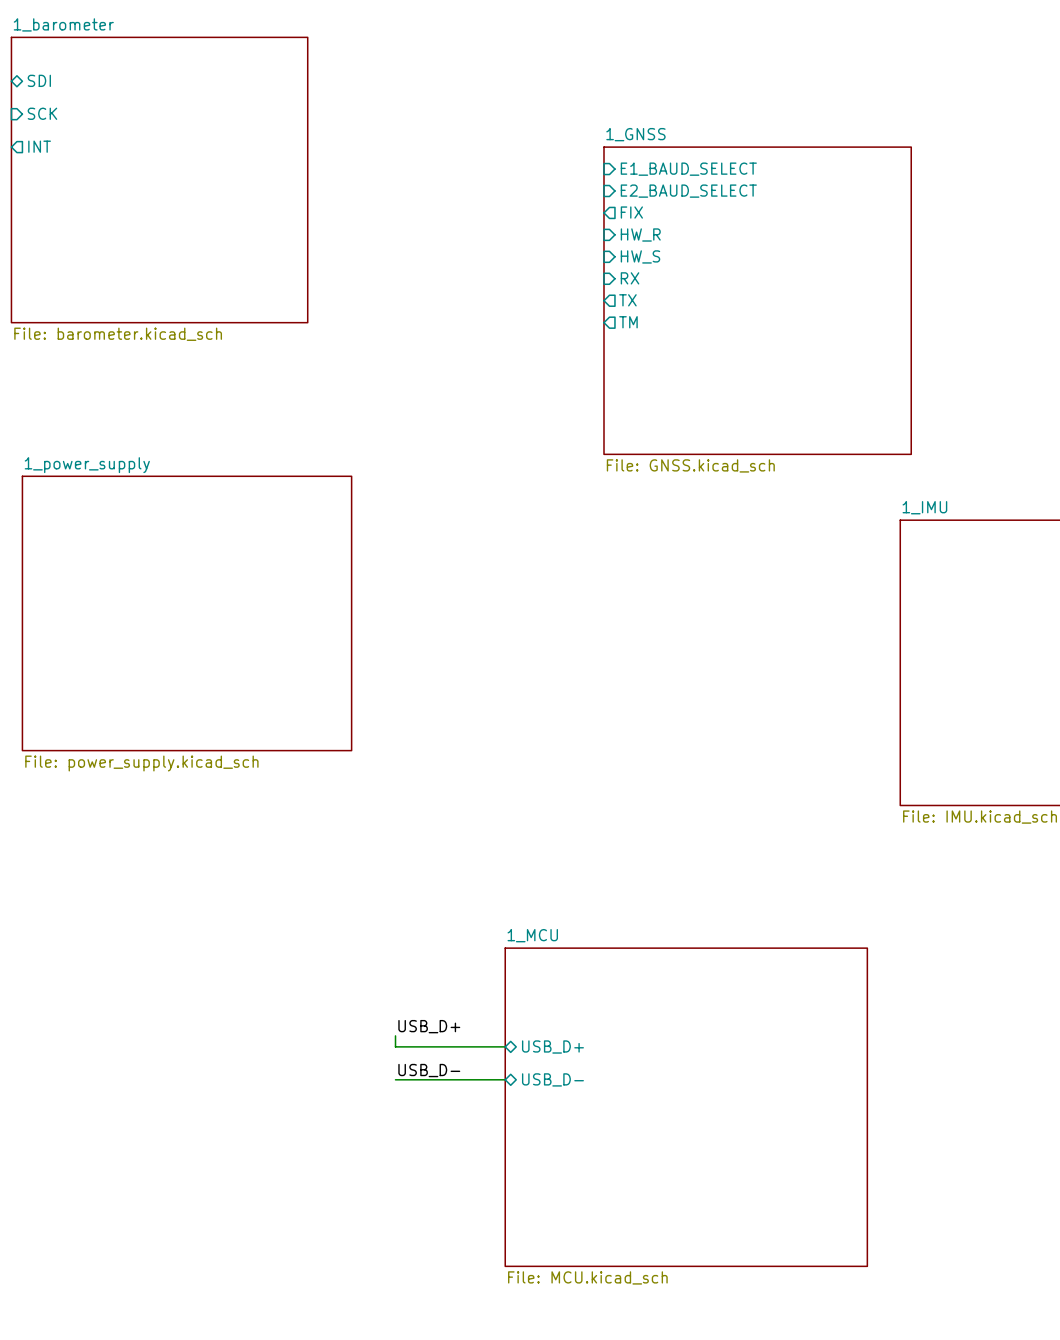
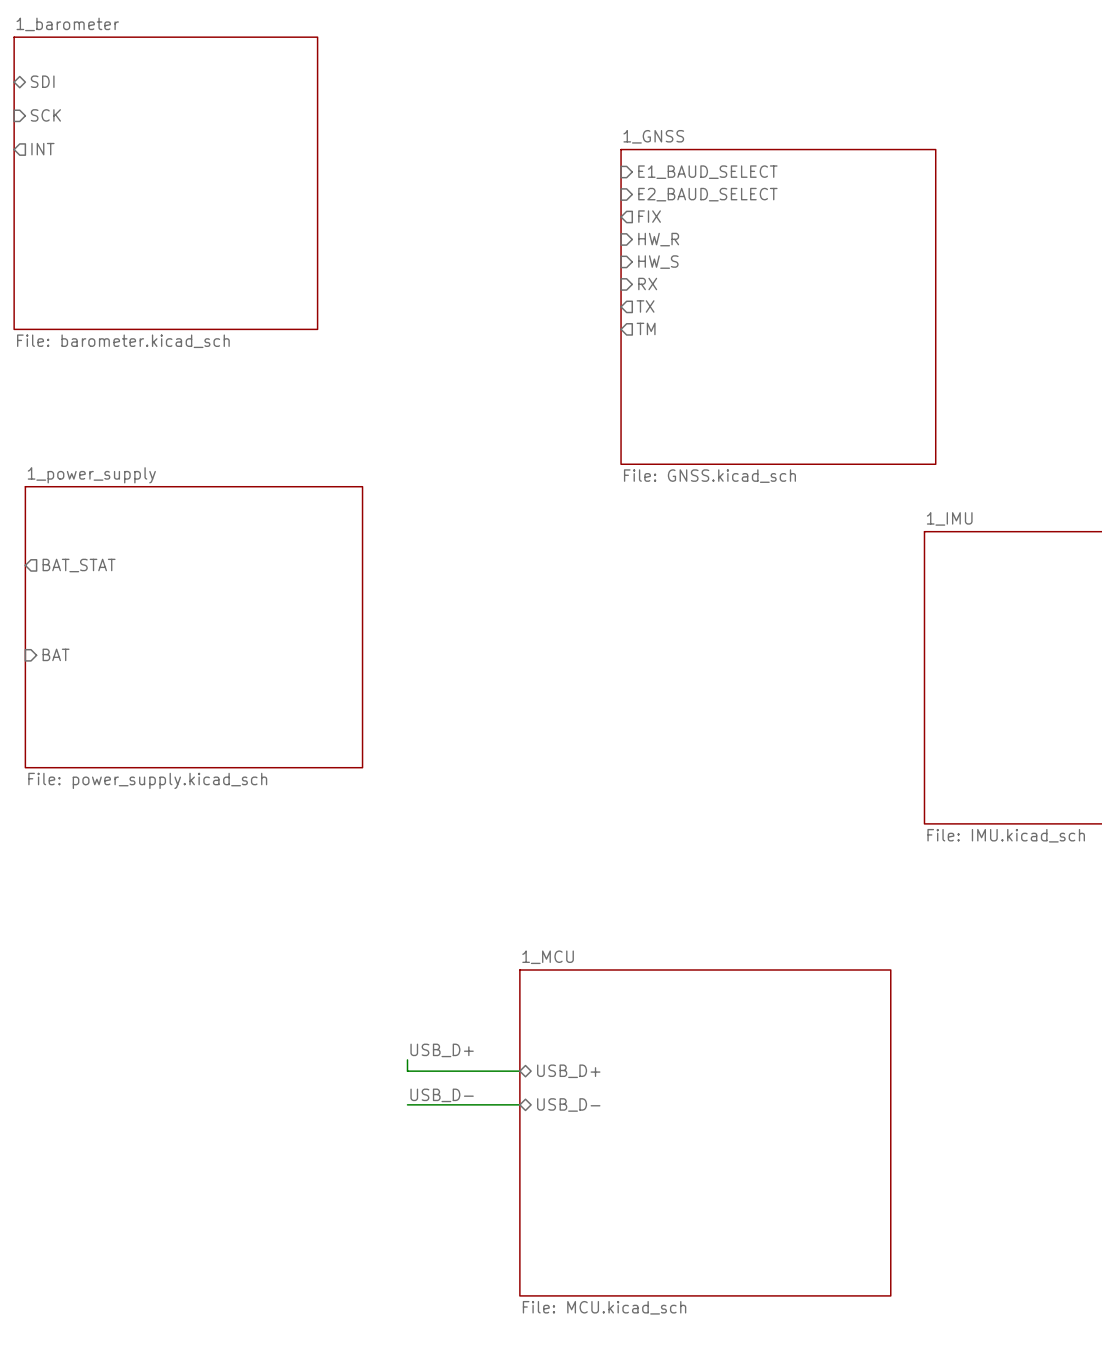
sheet pin: none -> BAT_STAT (79, 565)
sheet pin: none -> BAT (56, 654)

